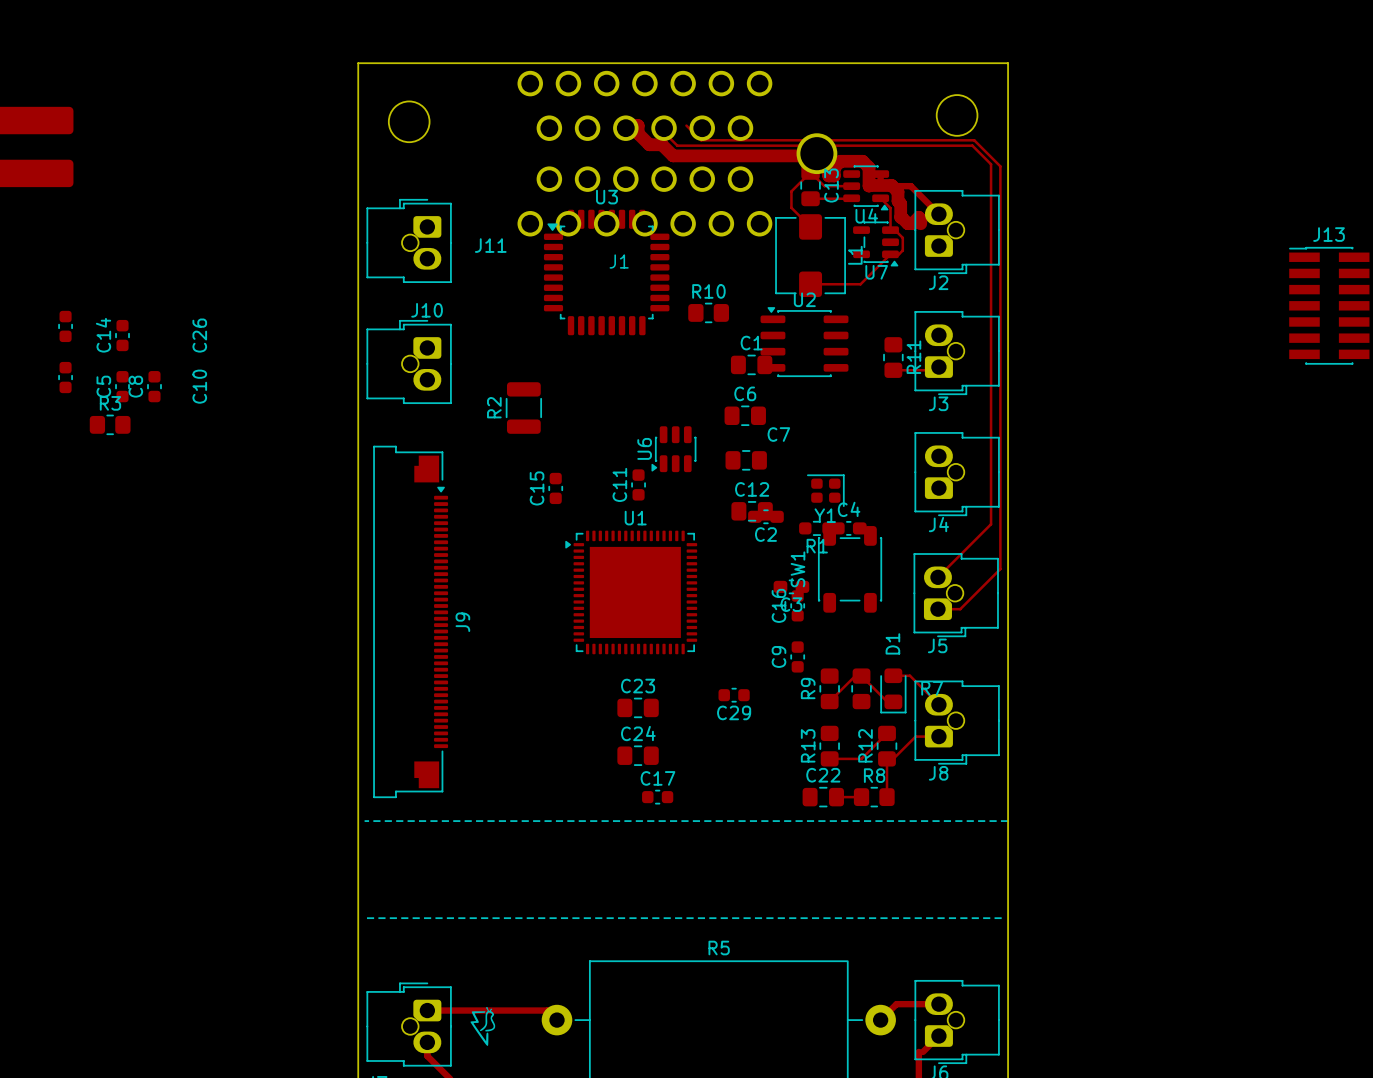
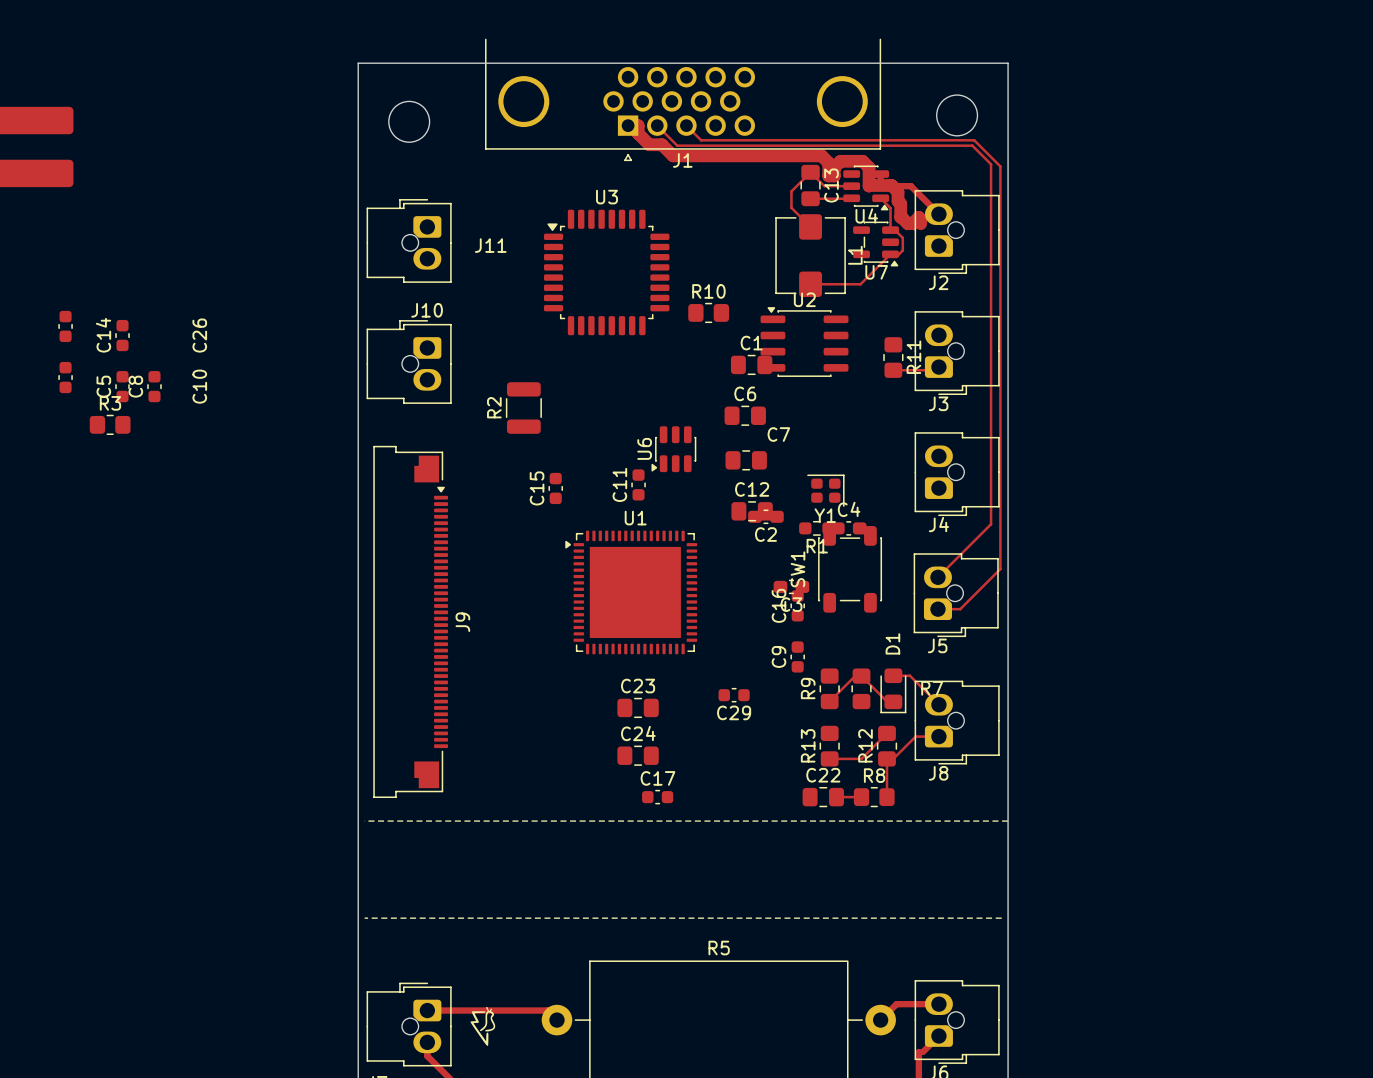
J1 footprint: [517, 70, 838, 237] -> [485, 38, 882, 162]
J1 name position: J1 (619, 261) -> J1 (682, 160)
J13: (1329, 305) -> none

